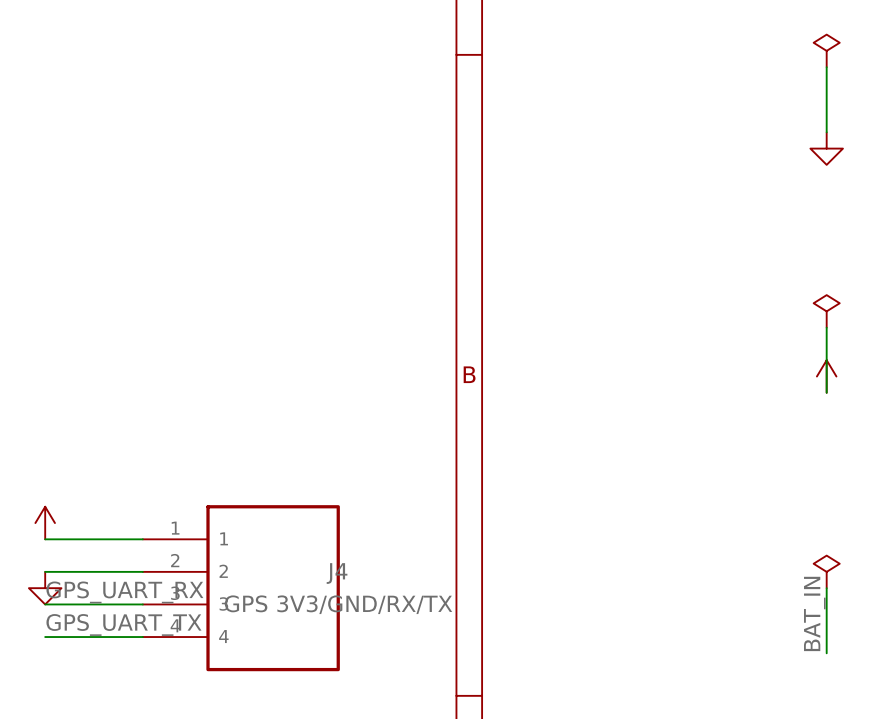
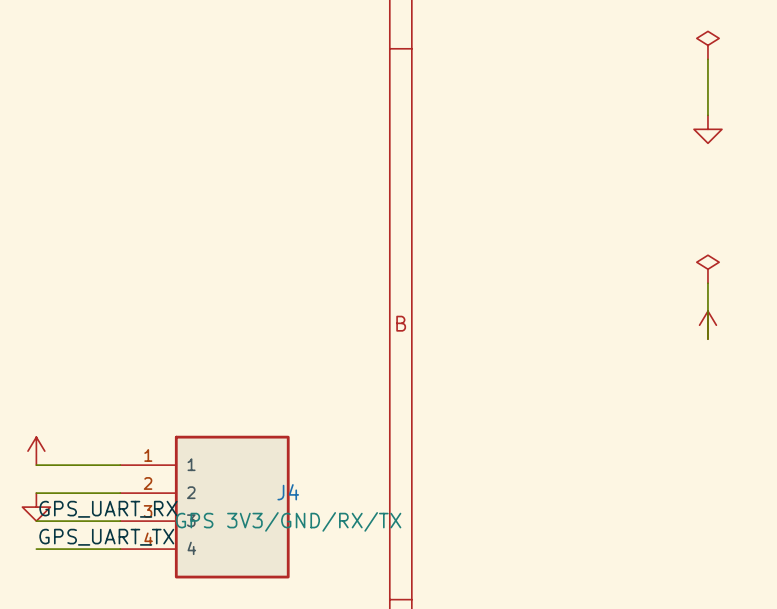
power symbol: (826, 571) -> none
wire: (826, 588) (826, 653) -> none
label: BAT_IN (814, 613) -> none

